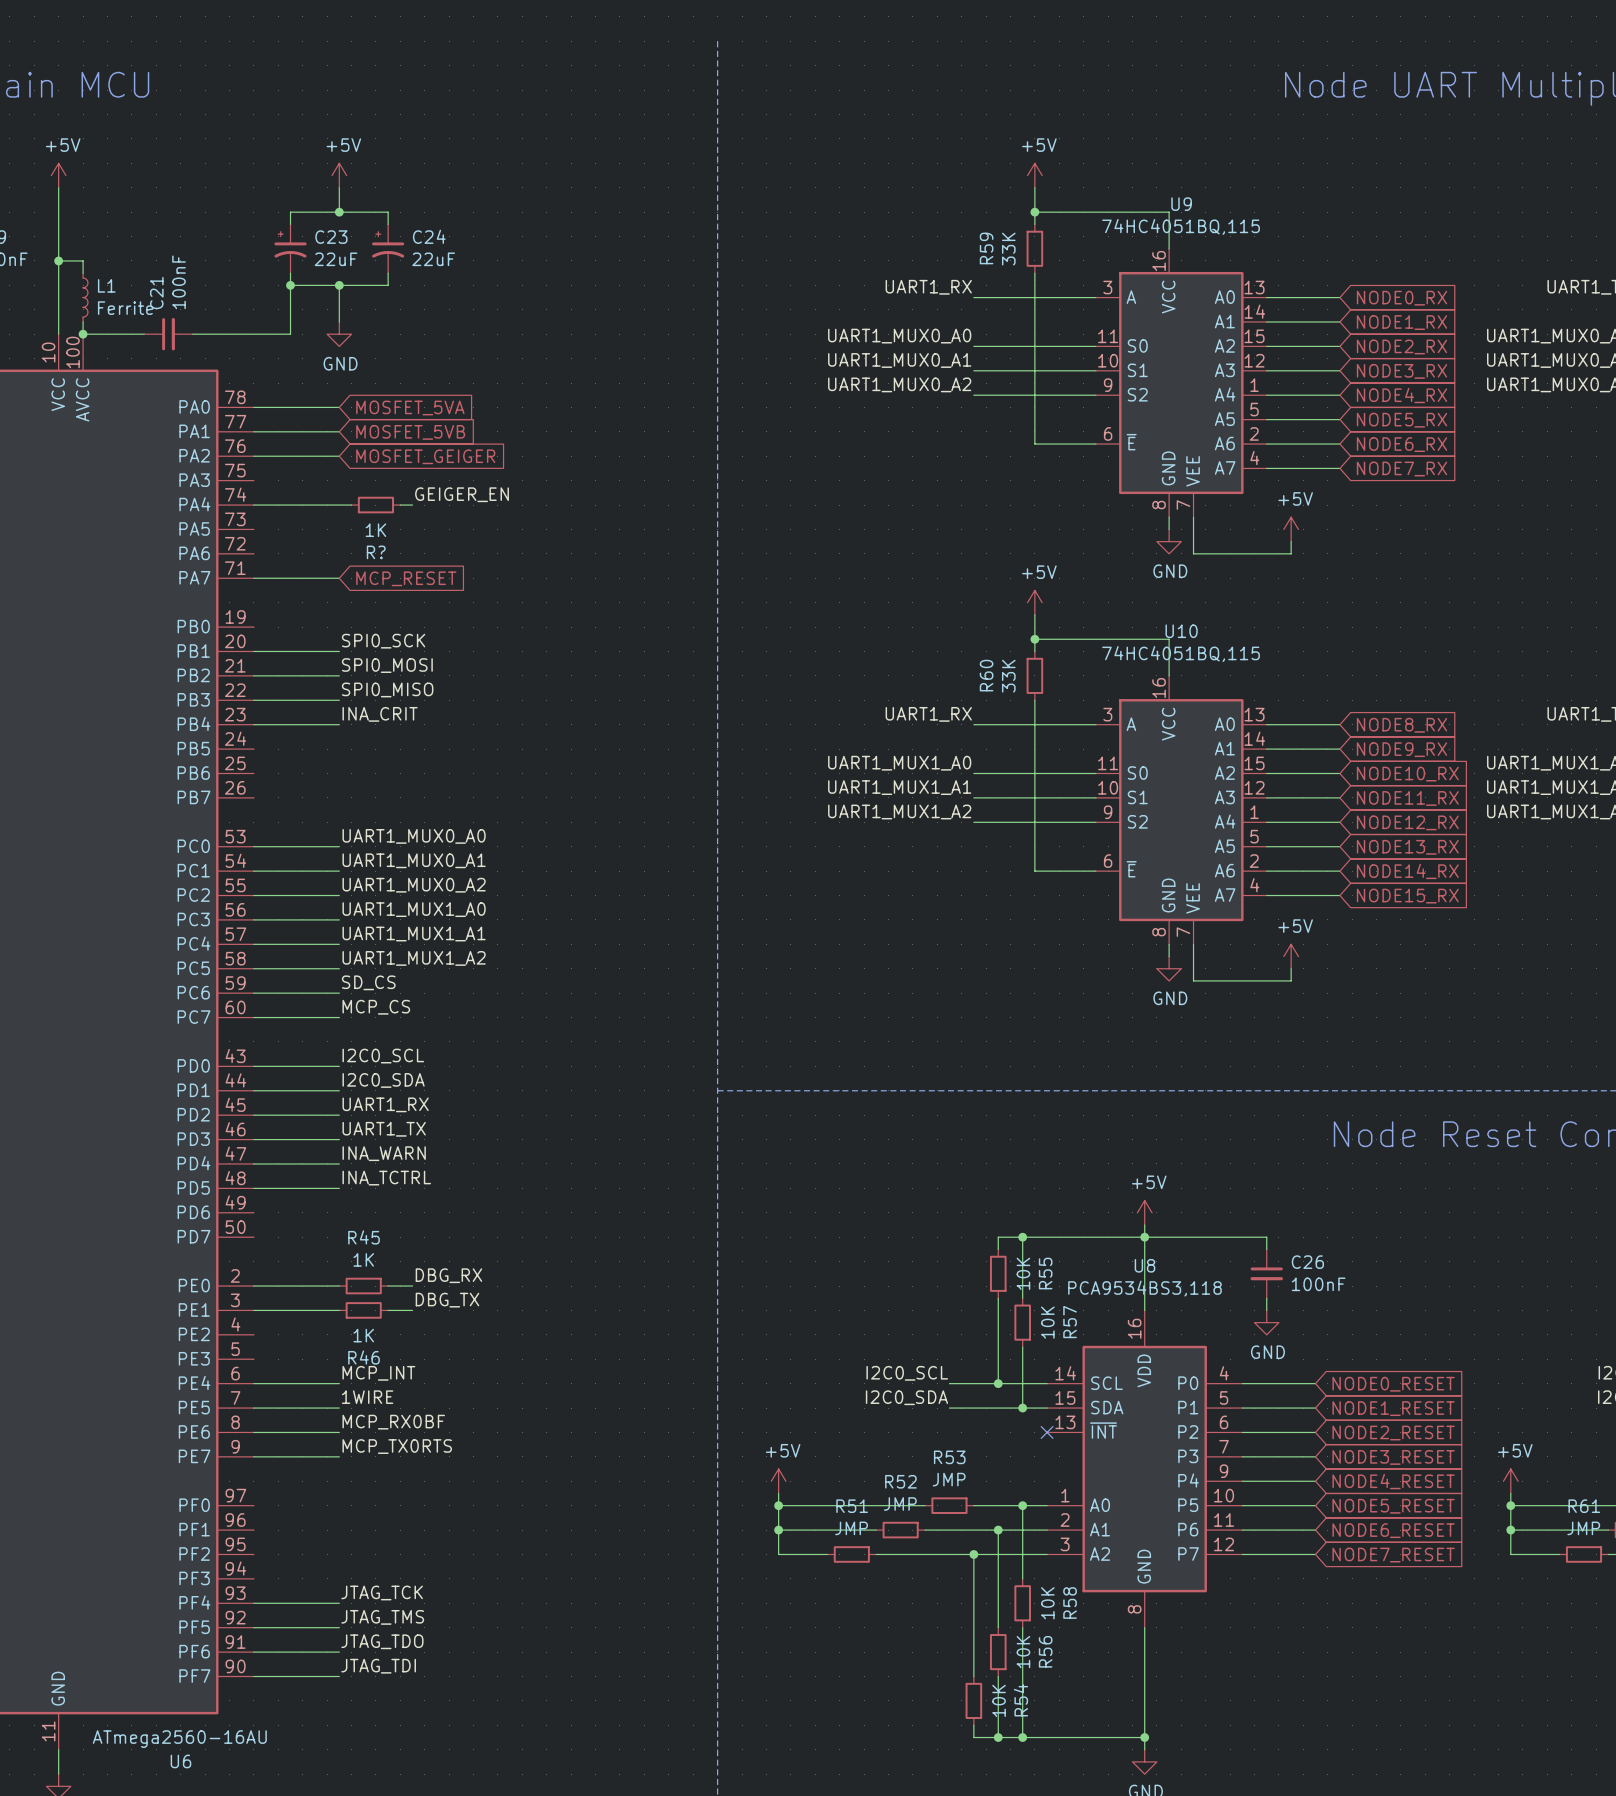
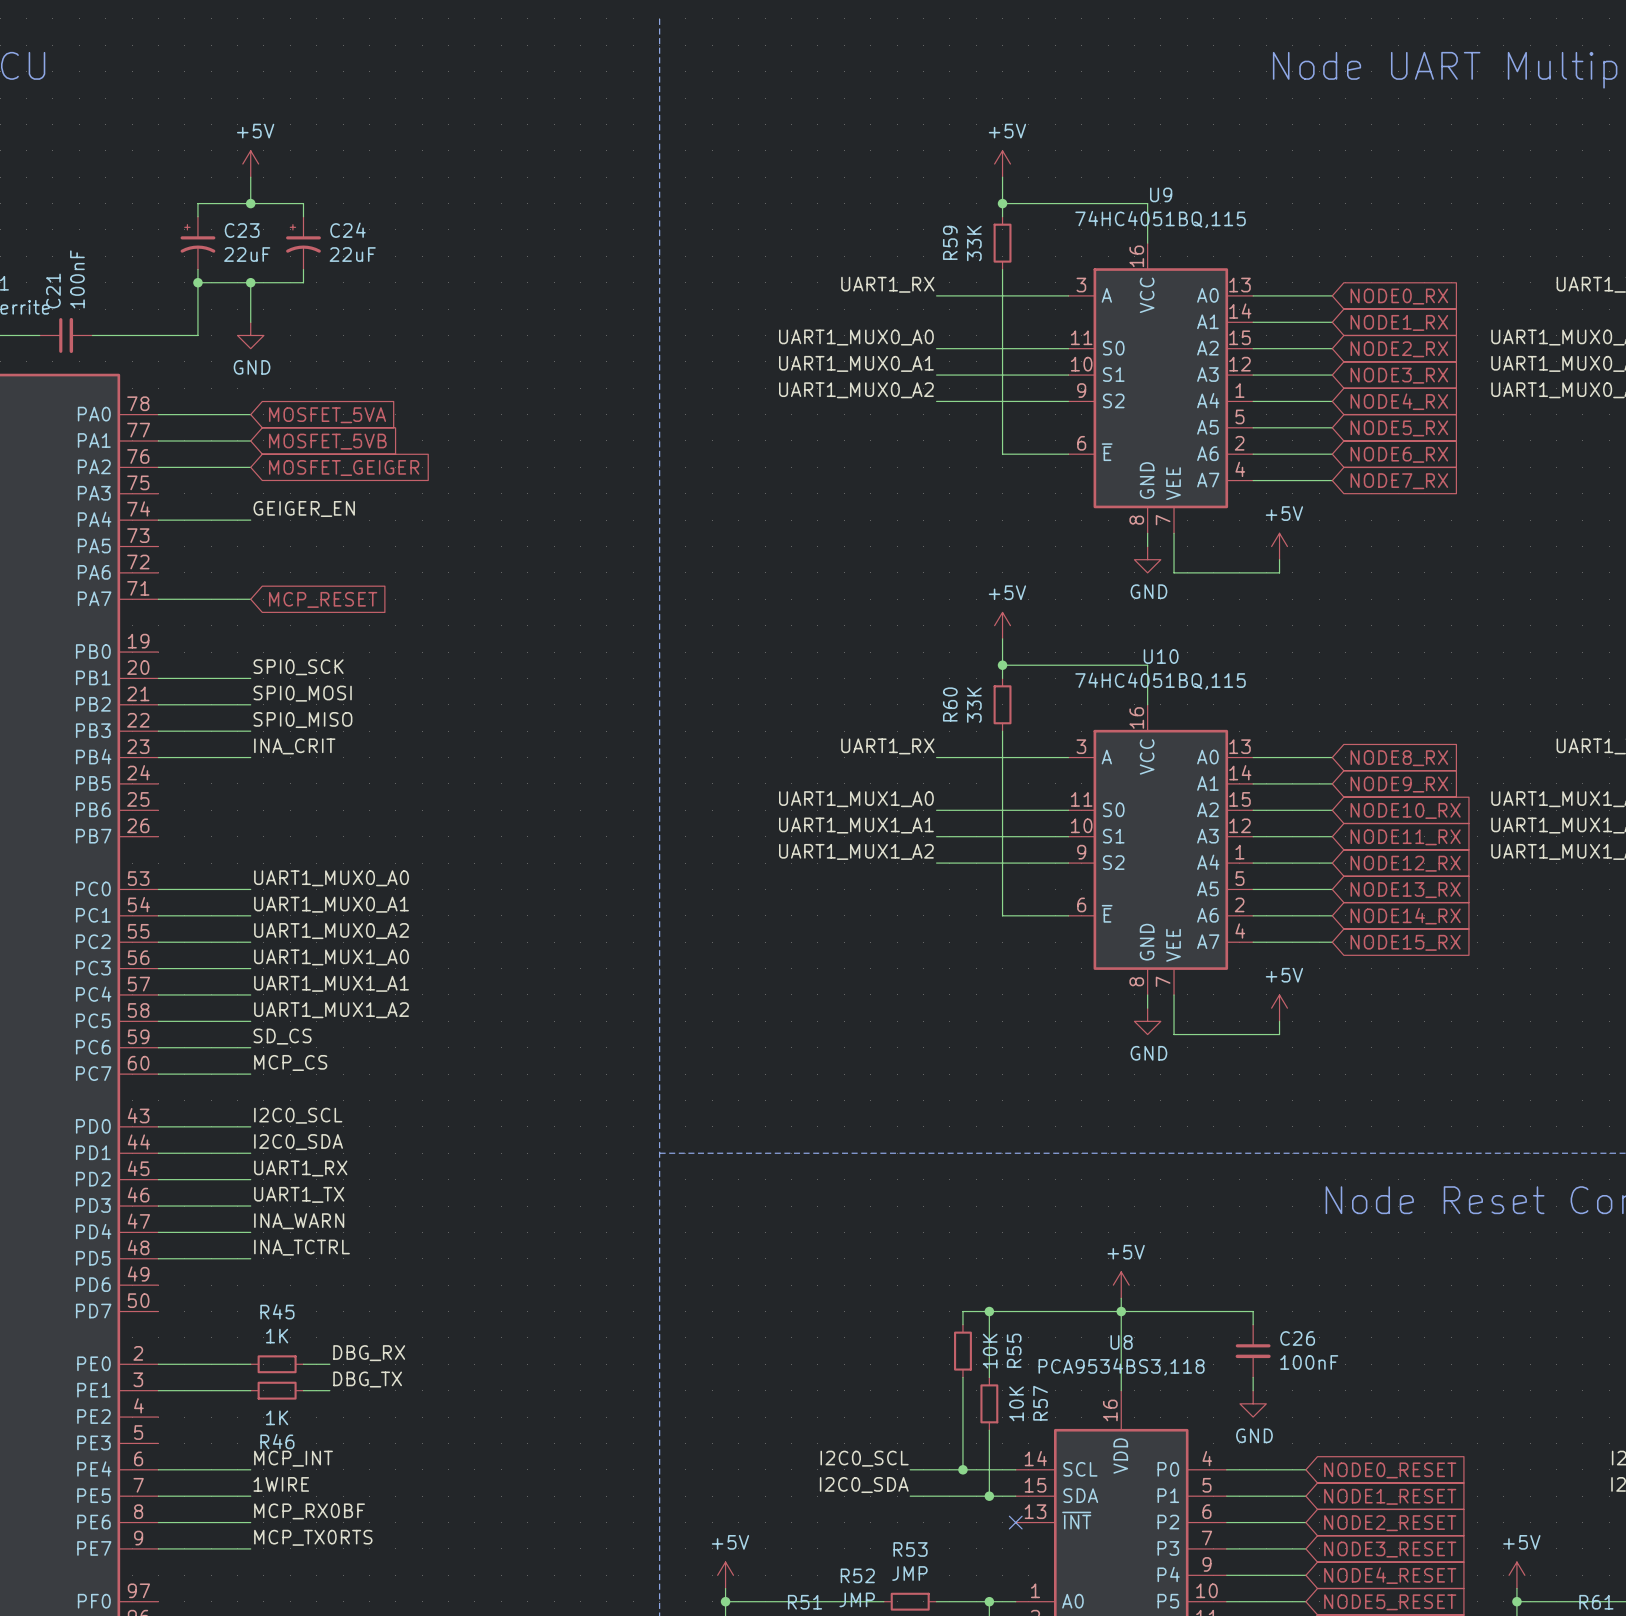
label position: GEIGER_EN (462, 494) -> GEIGER_EN (304, 508)
wire: (339, 505) (351, 505) -> none
R?: 1K (375, 505) -> none
wire: (400, 505) (412, 505) -> none

